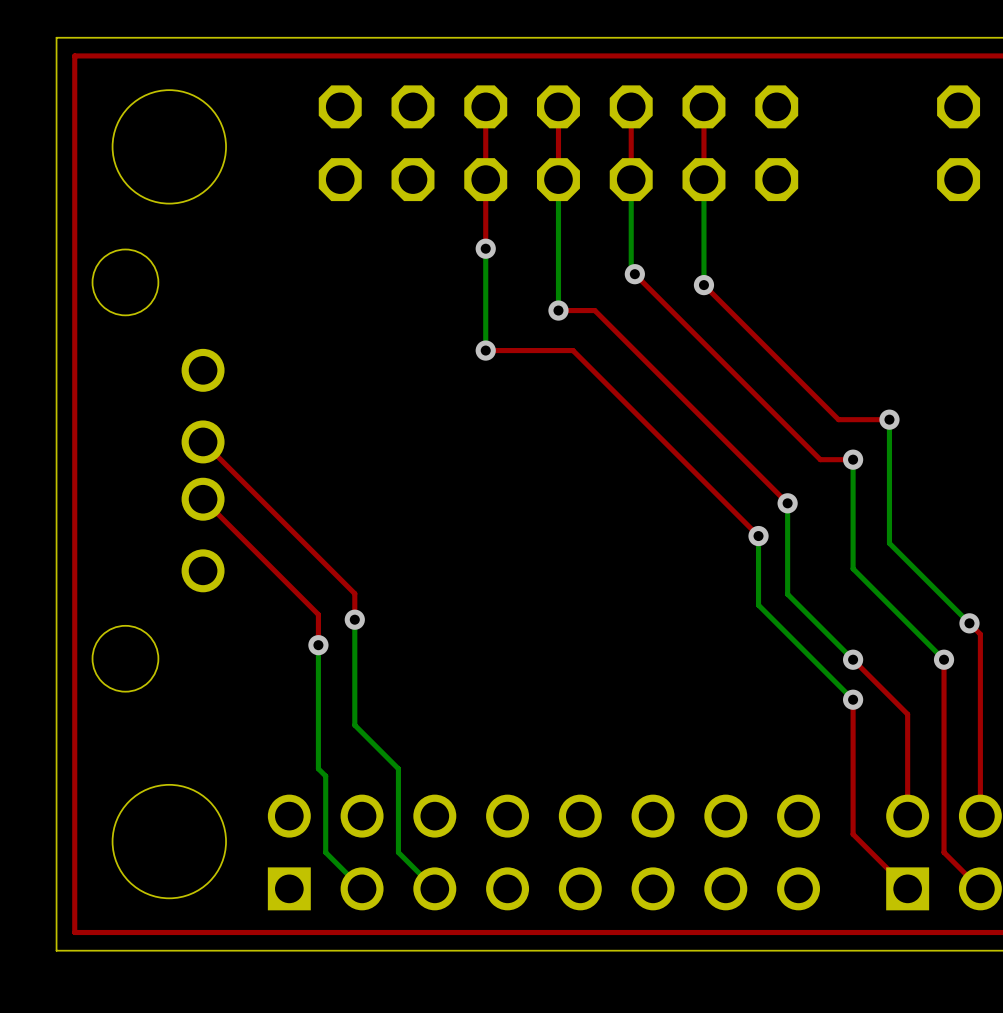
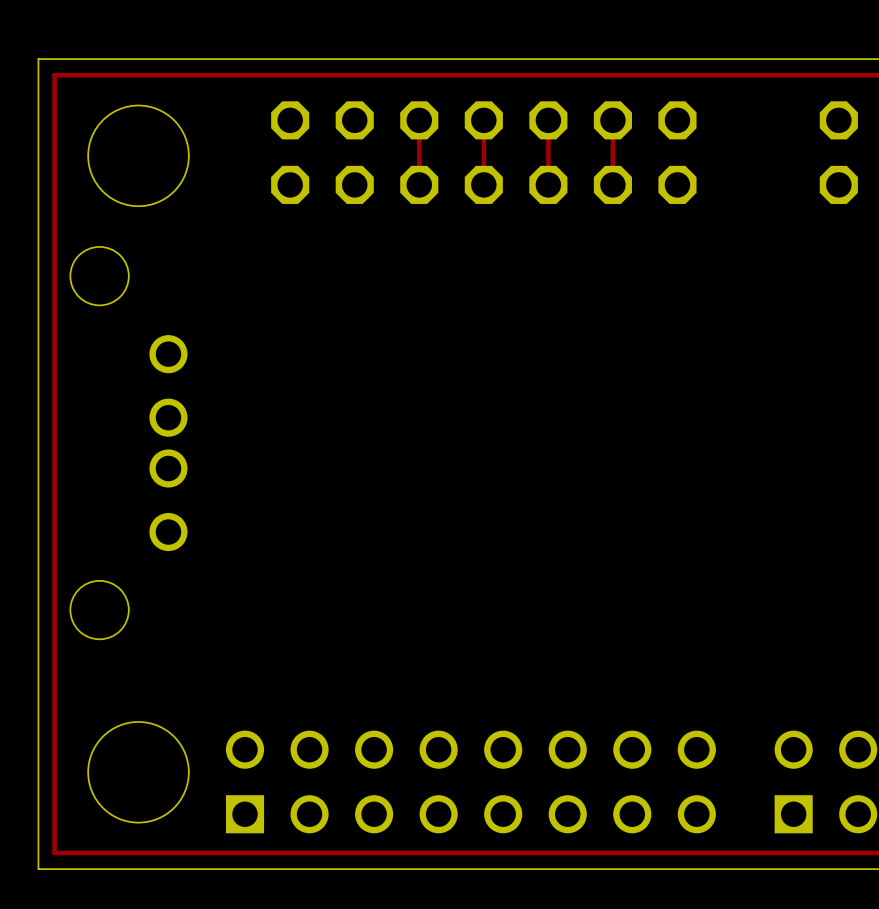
top track: (485, 179) (485, 248) -> none
bottom track: (558, 179) (558, 310) -> none
bottom track: (631, 179) (631, 270) (634, 274) -> none
bottom track: (703, 179) (703, 285) -> none
bottom track: (485, 248) (485, 350) -> none
via: (485, 248) -> none
top track: (634, 274) (820, 459) (853, 459) -> none
via: (634, 274) -> none
top track: (703, 285) (838, 419) (889, 419) -> none
via: (703, 285) -> none
top track: (558, 310) (594, 310) (787, 503) -> none
via: (558, 310) -> none
top track: (485, 350) (573, 350) (758, 536) -> none
via: (485, 350) -> none
bottom track: (889, 419) (889, 543) (969, 623) -> none
via: (889, 419) -> none
top track: (203, 441) (354, 593) (354, 619) -> none
bottom track: (853, 459) (853, 568) (944, 659) -> none
via: (853, 459) -> none
top track: (203, 499) (318, 614) (318, 645) -> none
bottom track: (787, 503) (787, 594) (853, 659) -> none
via: (787, 503) -> none
bottom track: (758, 536) (758, 605) (853, 699) -> none
via: (758, 536) -> none
bottom track: (354, 619) (354, 725) (398, 768) (398, 852) (434, 888) -> none
via: (354, 619) -> none
top track: (969, 623) (980, 634) (980, 816) -> none
via: (969, 623) -> none
bottom track: (318, 645) (318, 768) (325, 776) (325, 852) (362, 888) -> none
via: (318, 645) -> none
top track: (853, 659) (907, 714) (907, 816) -> none
via: (853, 659) -> none
top track: (944, 659) (944, 852) (980, 888) -> none
via: (944, 659) -> none
top track: (853, 699) (853, 834) (907, 888) -> none
via: (853, 699) -> none

